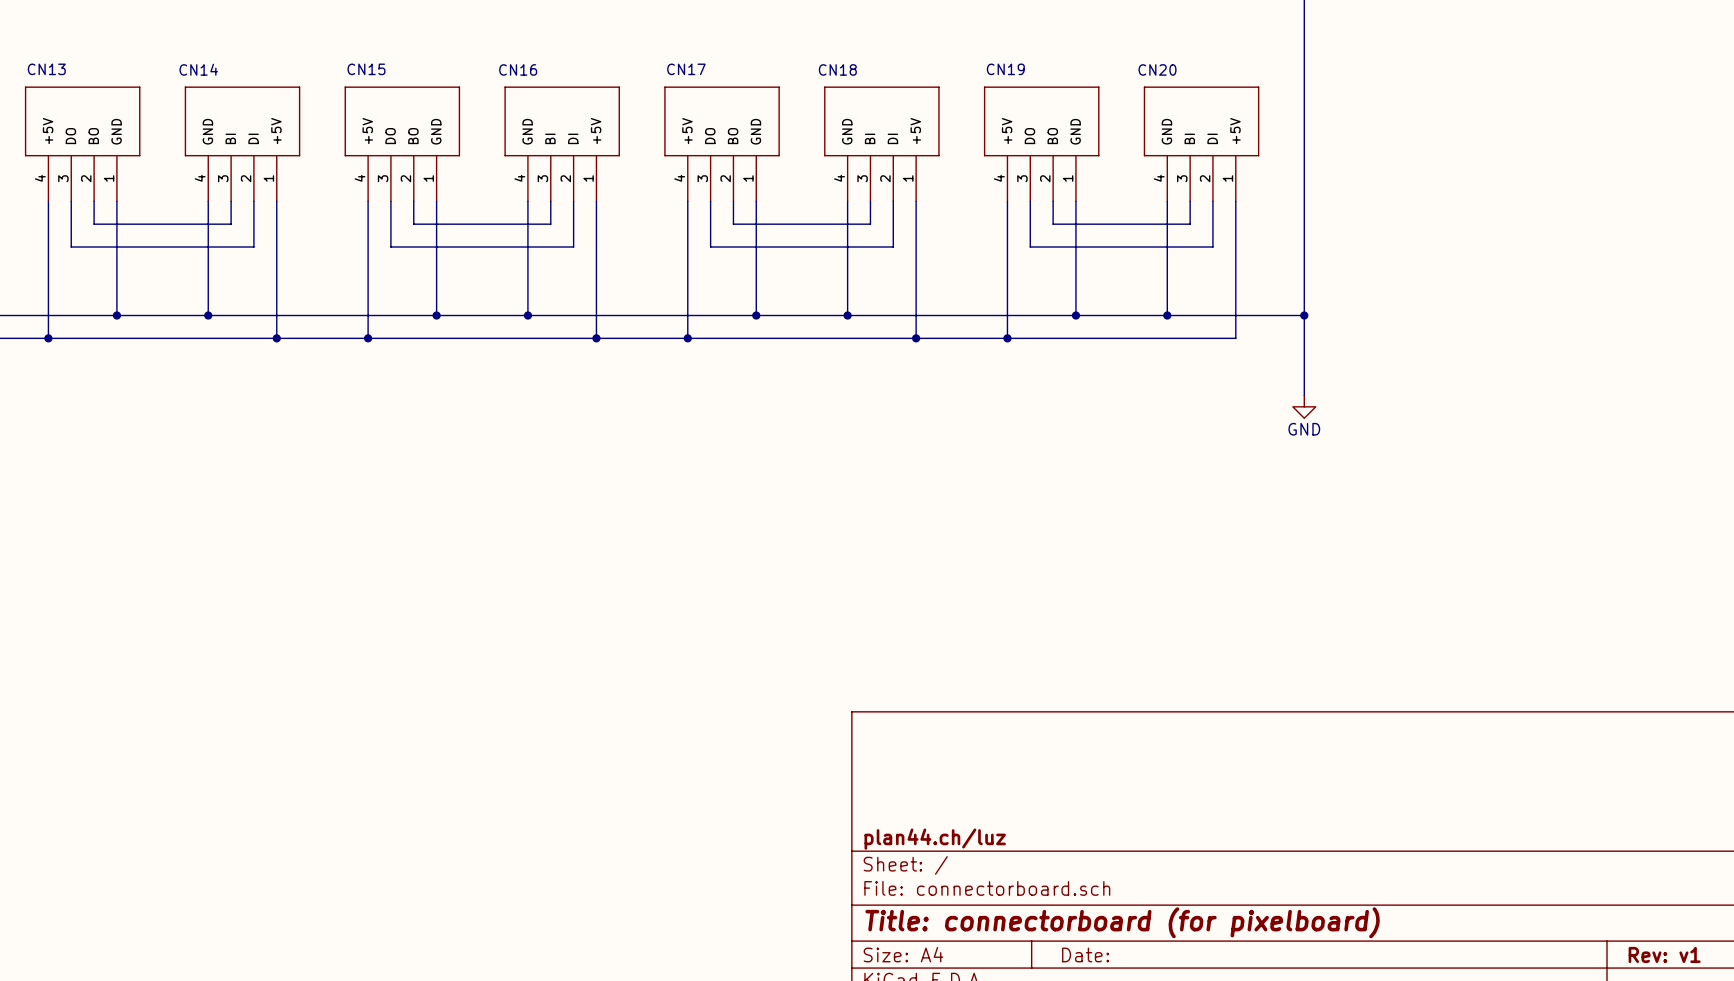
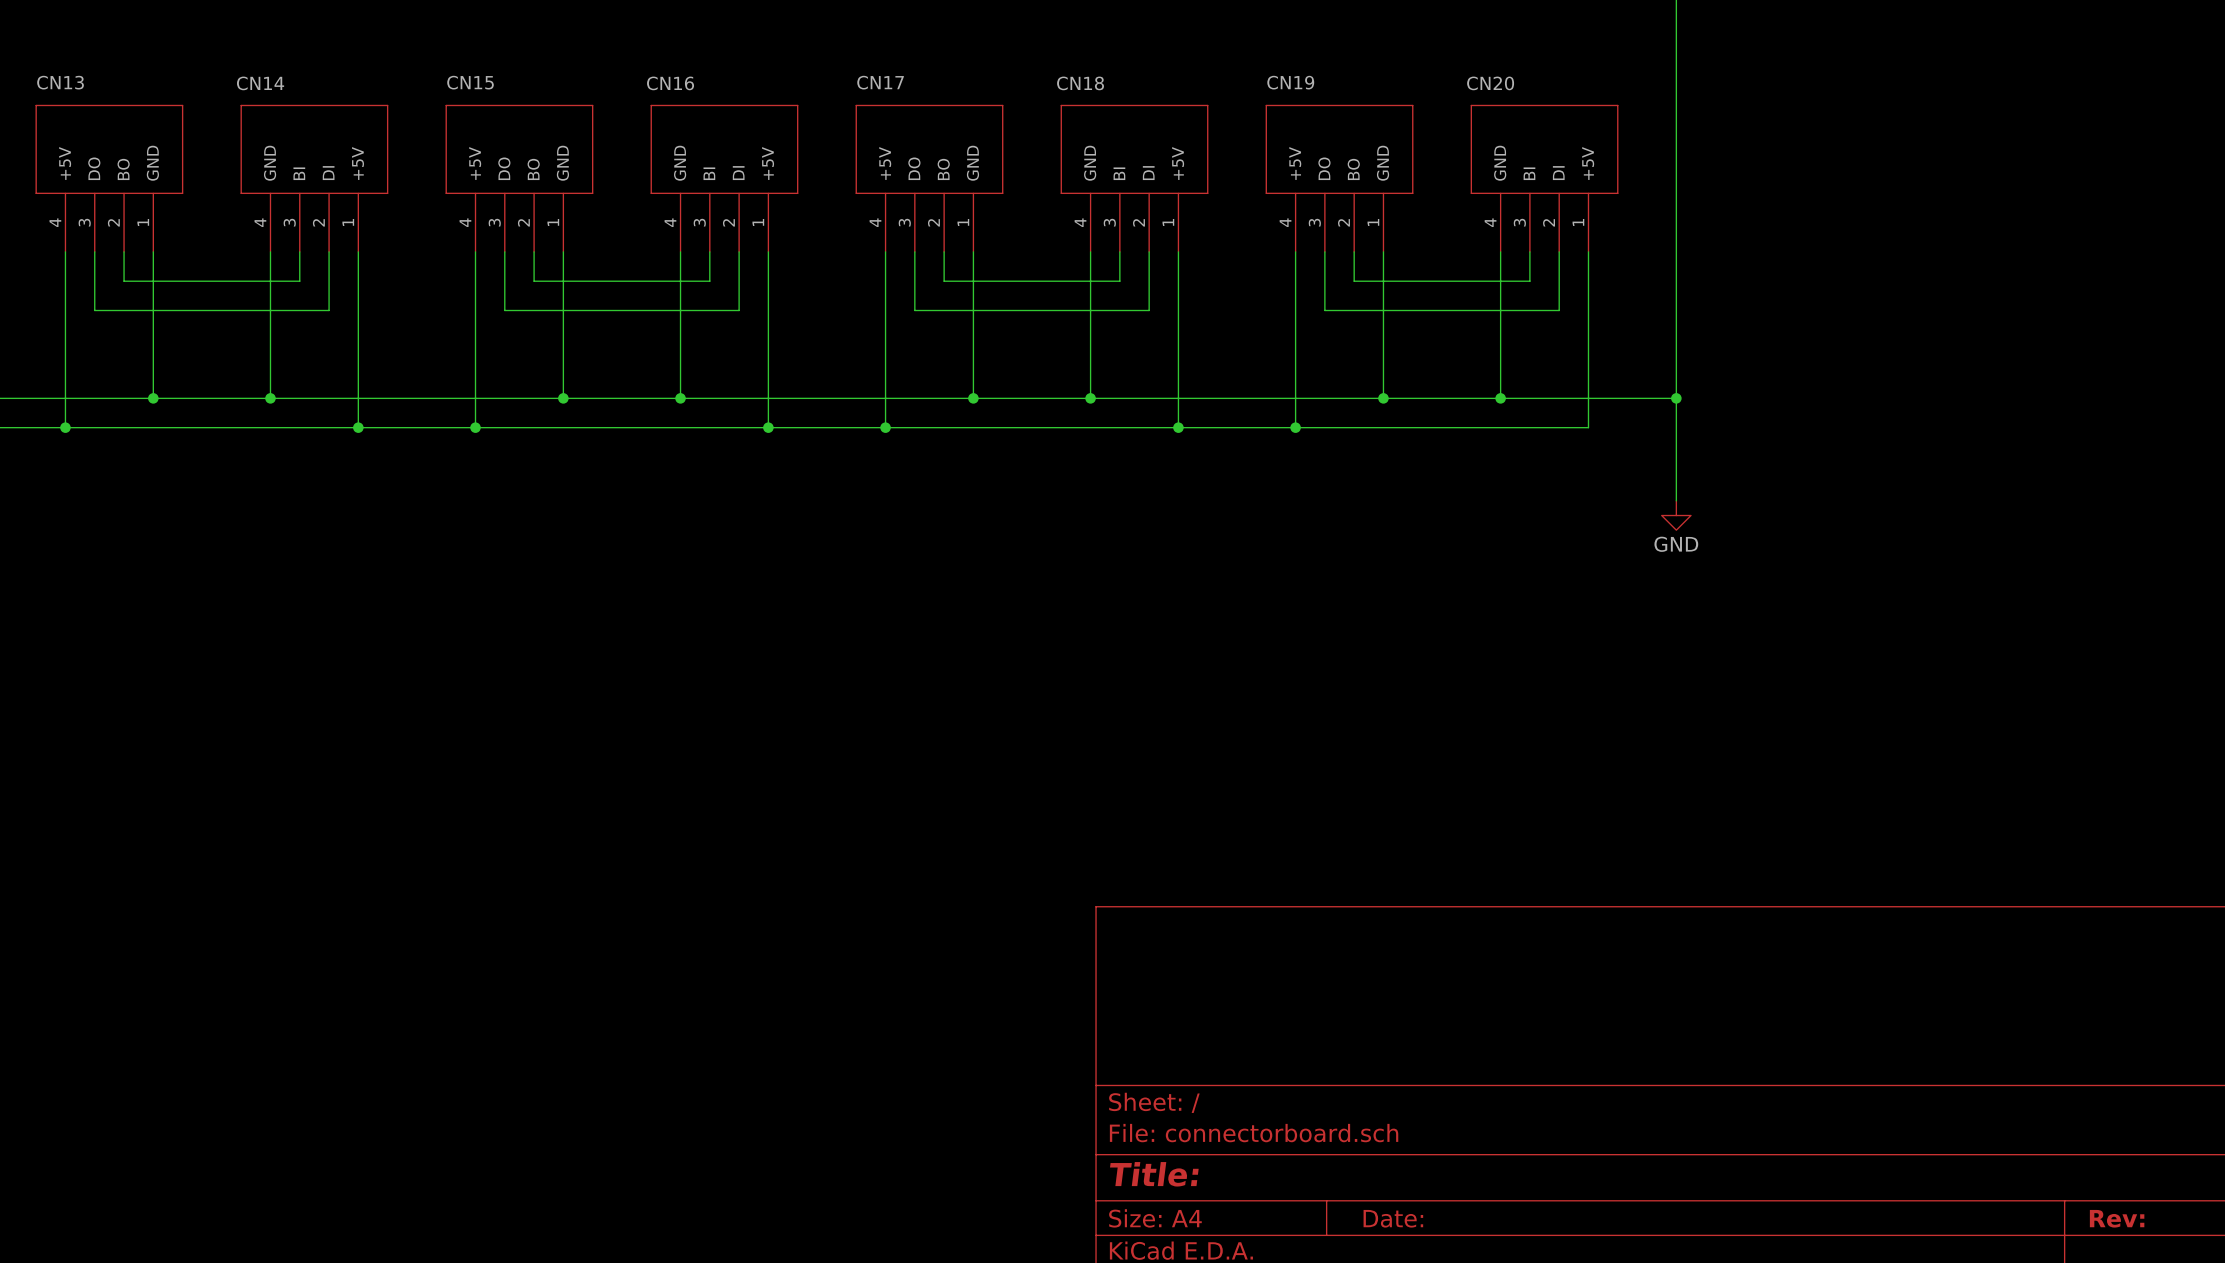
title block: plan44.ch/luz (935, 839) -> none
title block: Title: connectorboard (for pixelboard) (1122, 922) -> Title: (1154, 1174)
title block: Rev: v1 (1664, 954) -> Rev: (2117, 1218)

